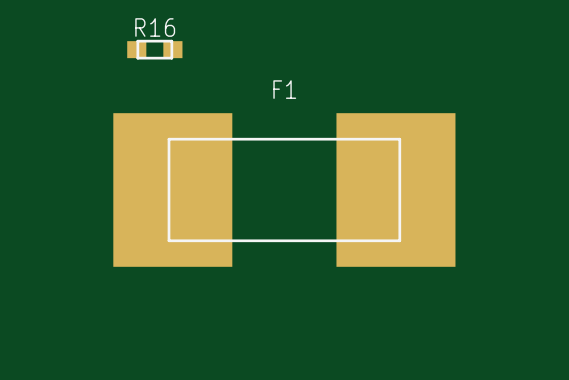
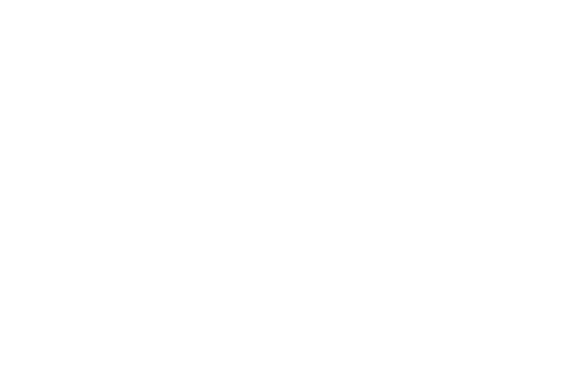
R16: (154, 49) -> none
F1: (284, 189) -> none

